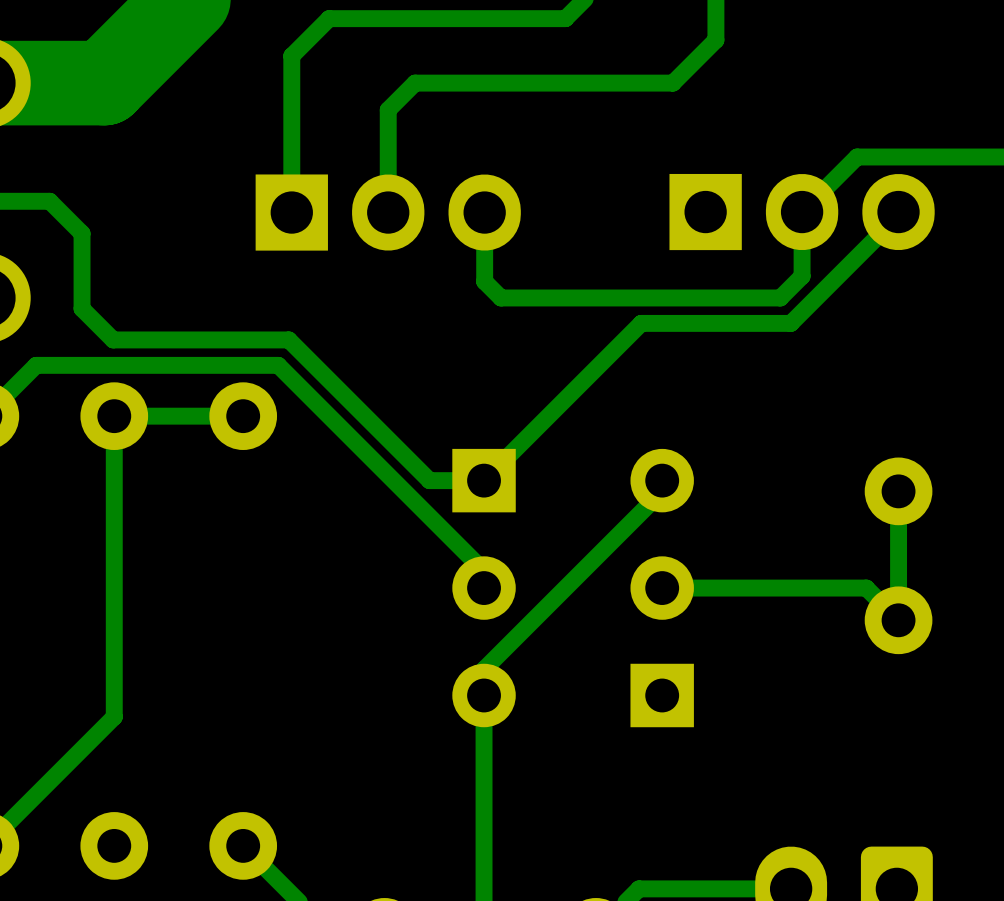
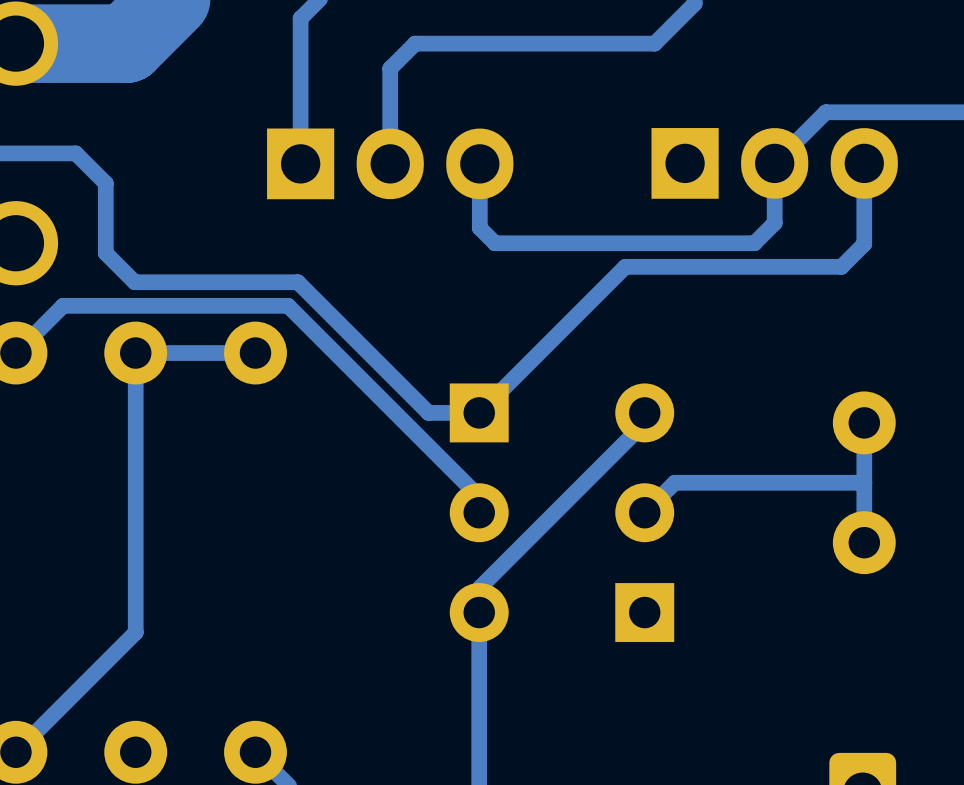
track: (898, 215) (790, 323) -> (864, 166) (864, 244) (841, 266) (764, 266)
track: (662, 588) (866, 588) (898, 620) -> (644, 512) (674, 482) (864, 482)

